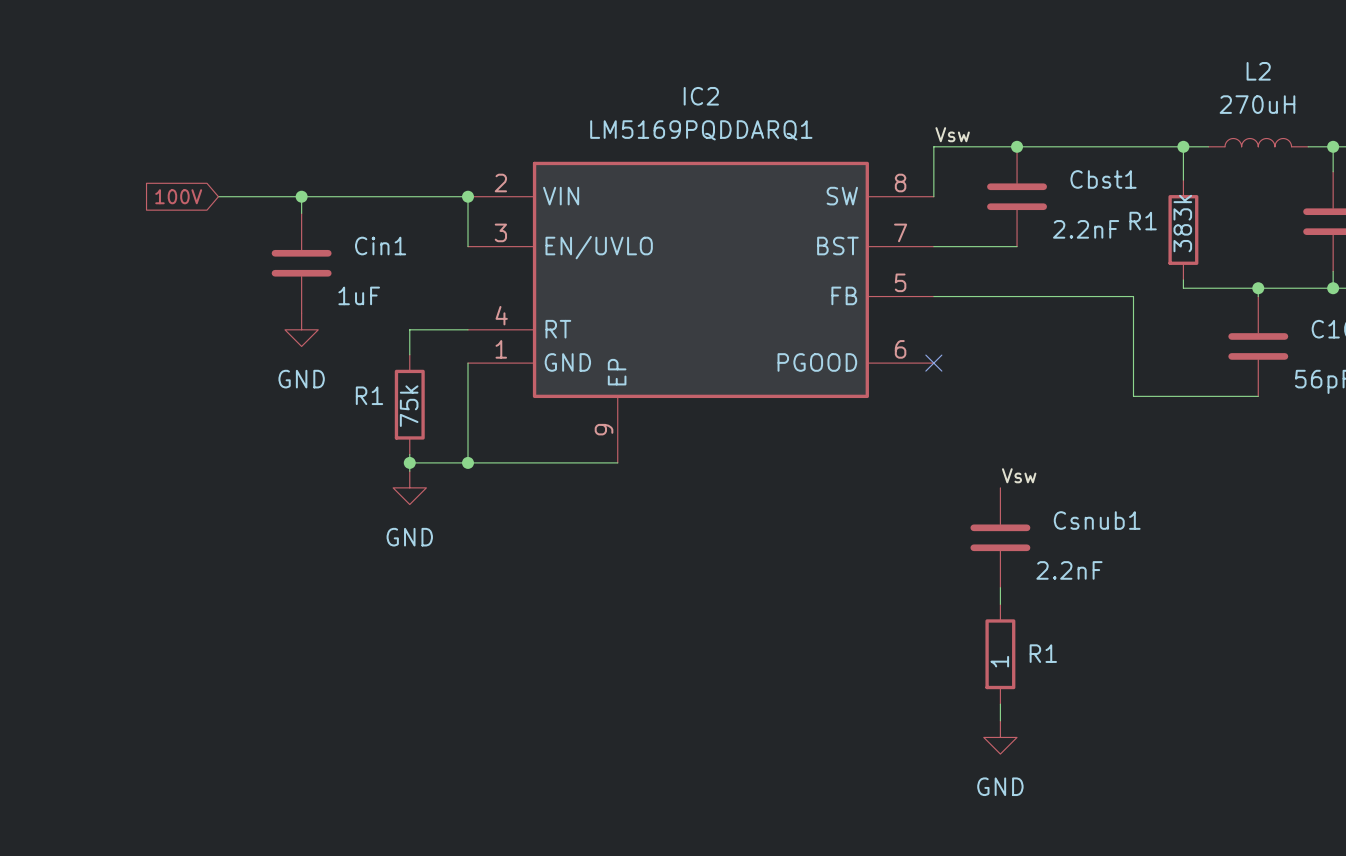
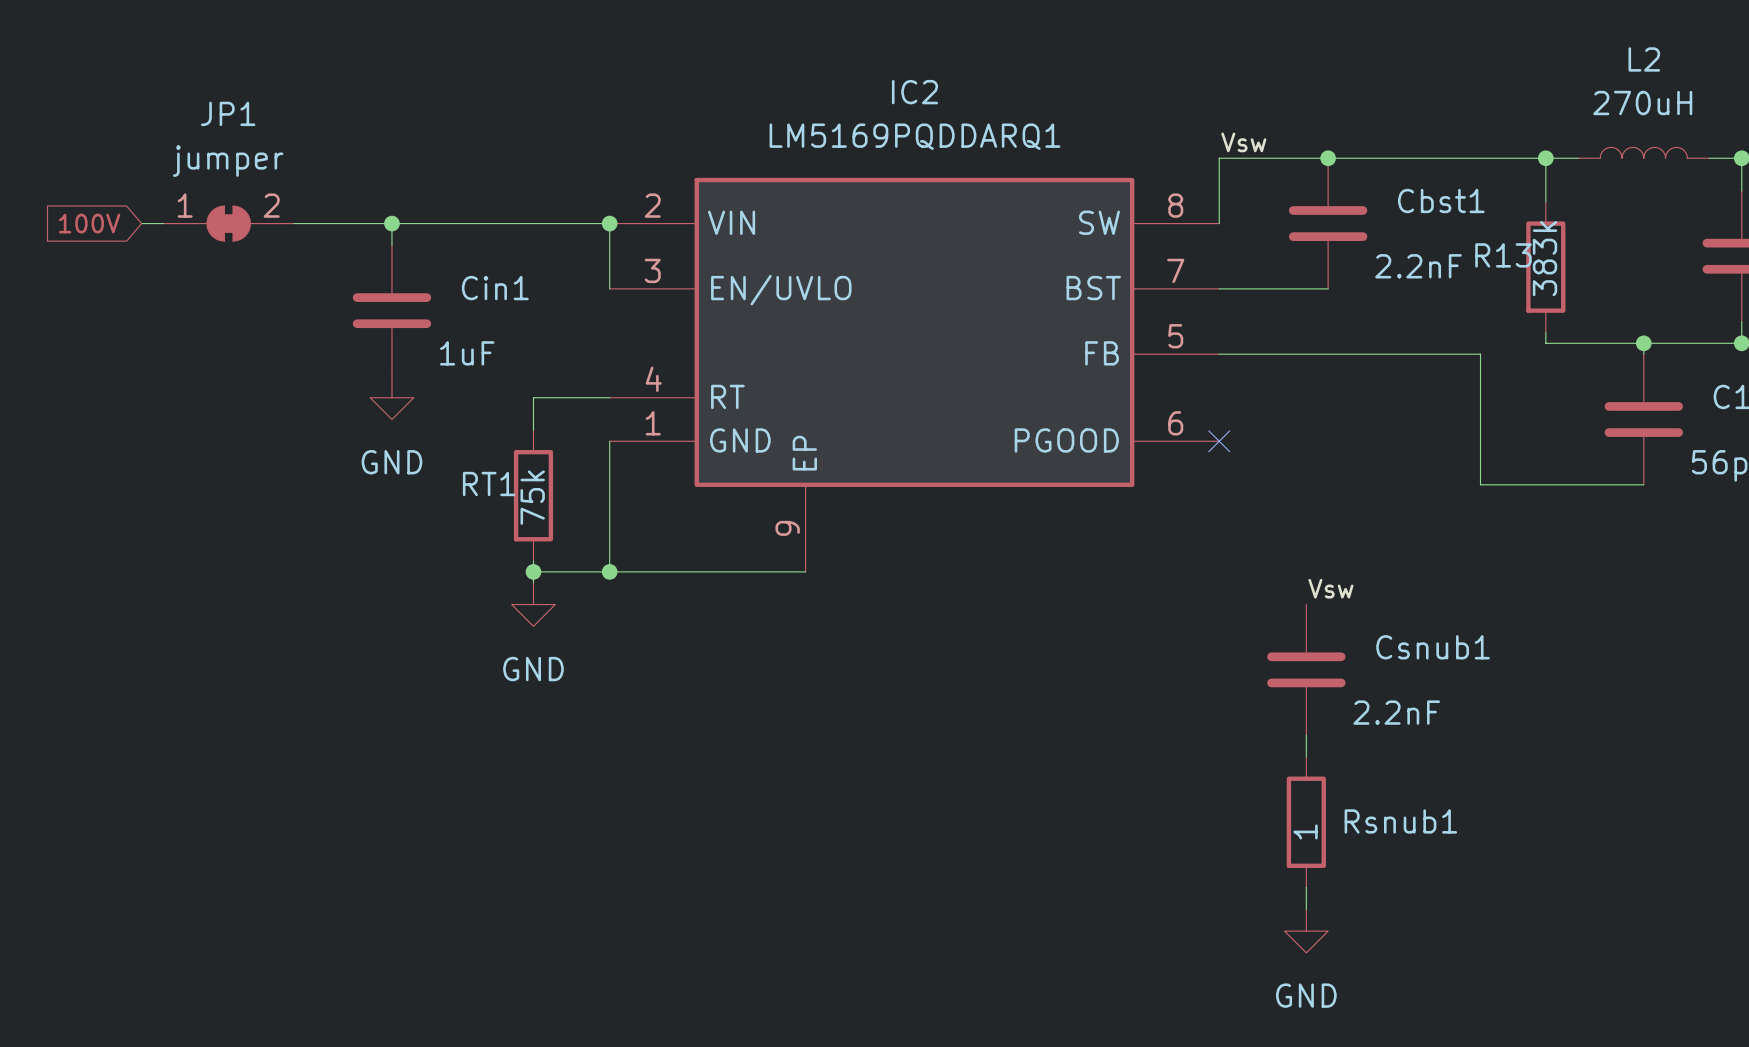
wire: none -> (141, 223) (163, 223)
JP1: none -> jumper (228, 223)
global label position: 100V (178, 196) -> 100V (89, 223)
R1 name: R1 (1143, 221) -> R13 (1503, 255)
R1 name: R1 (369, 395) -> RT1 (489, 484)
R1 name: R1 (1043, 653) -> Rsnub1 (1400, 821)

